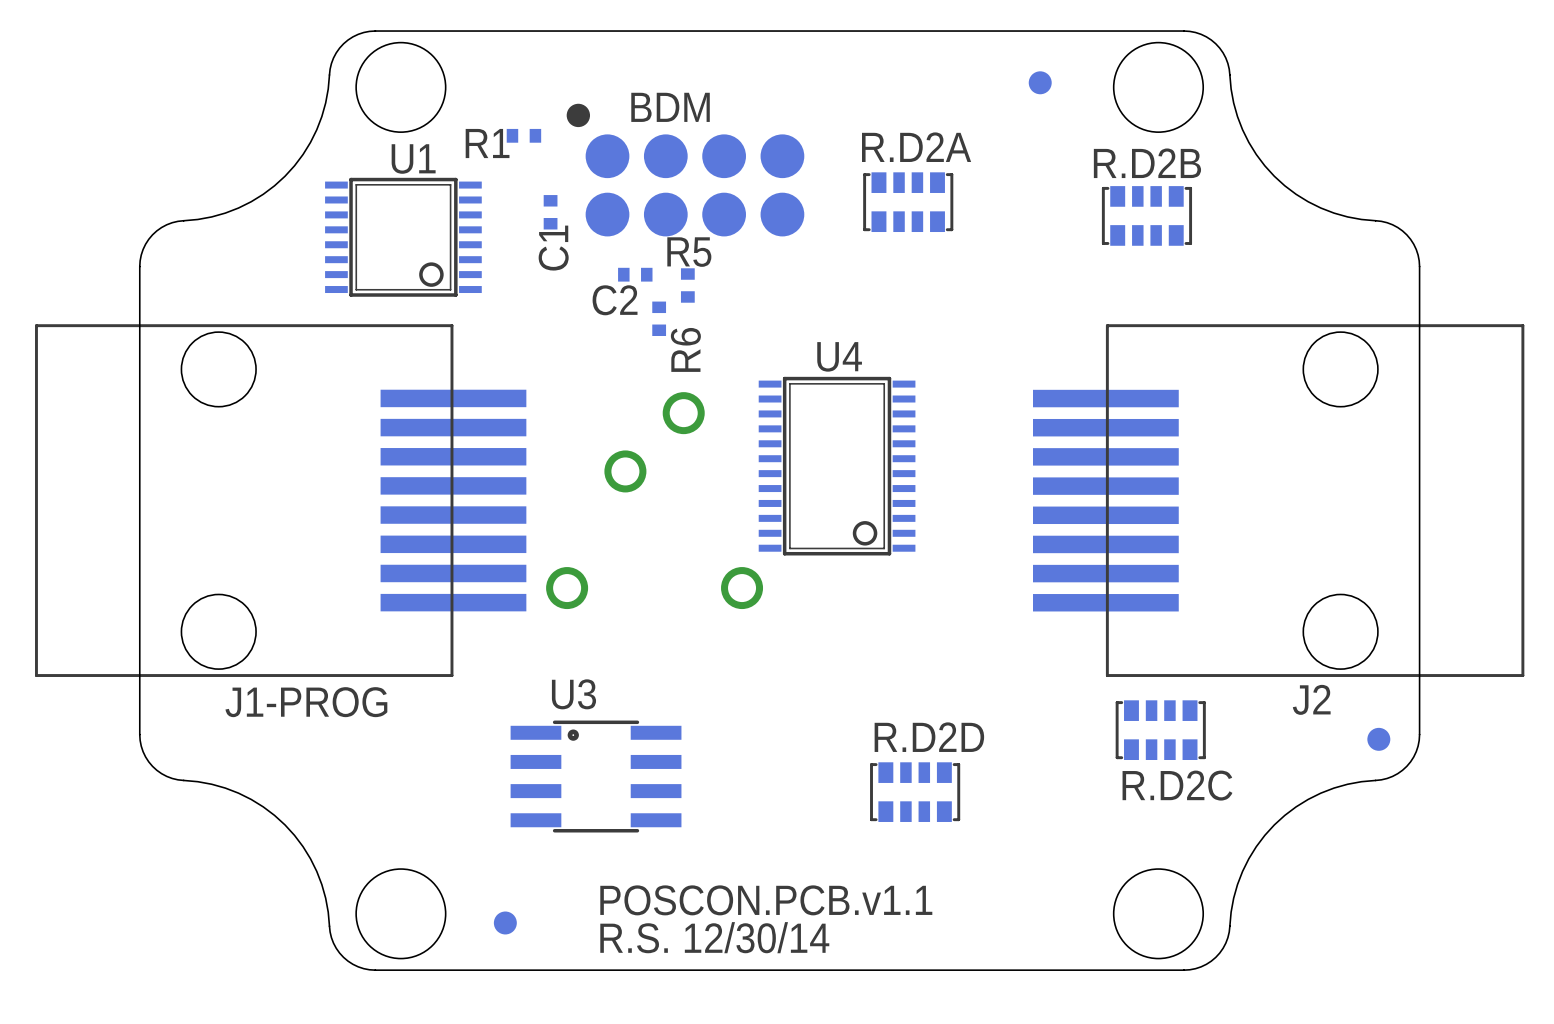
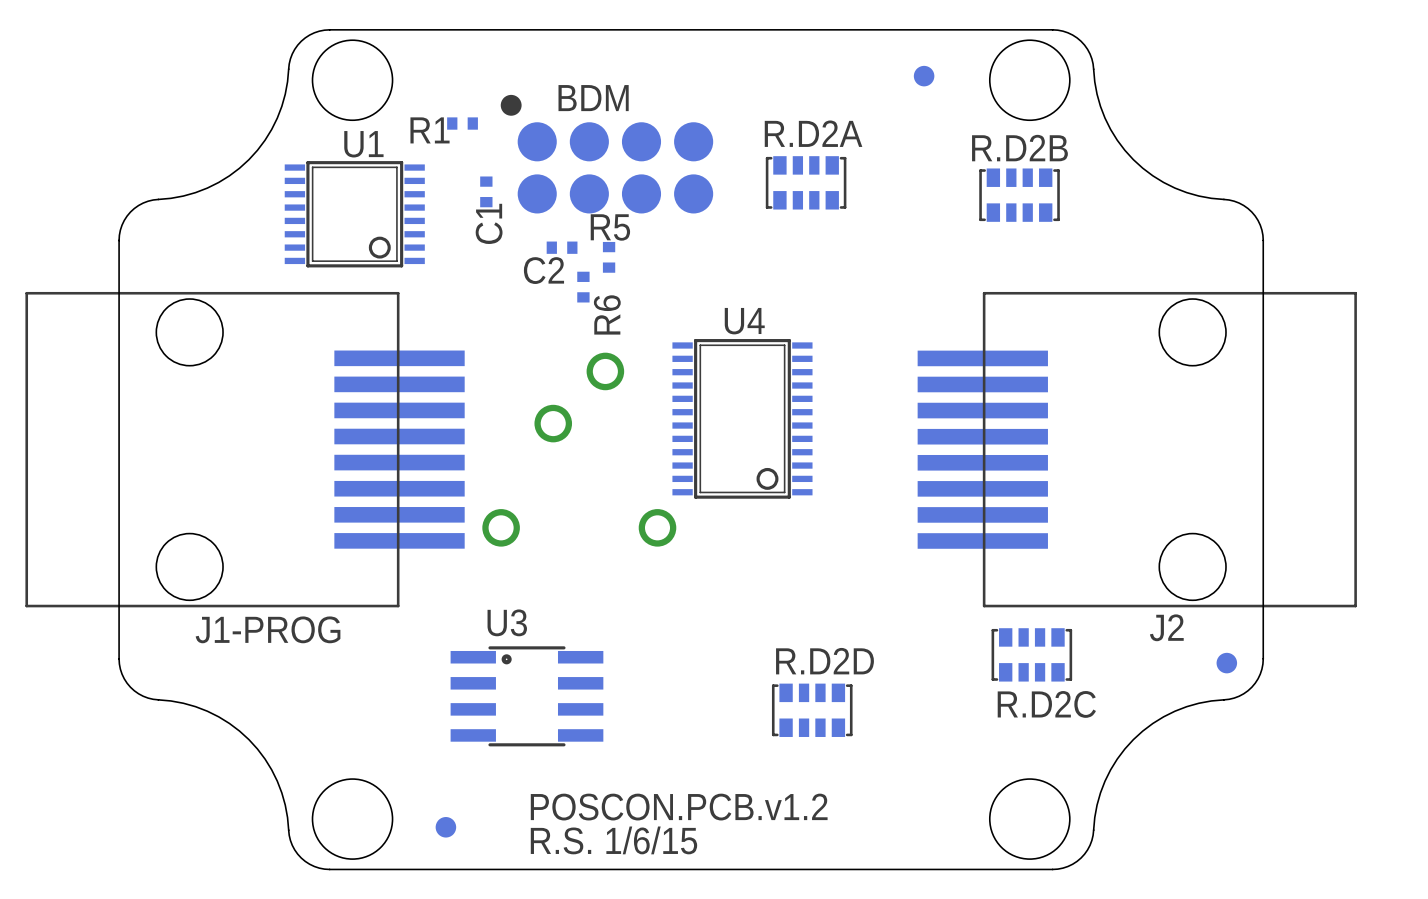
text: POSCON.PCB.v1.1 (766, 900) -> POSCON.PCB.v1.2 (679, 807)
text: R.S. 12/30/14 (714, 937) -> R.S. 1/6/15 (613, 840)

